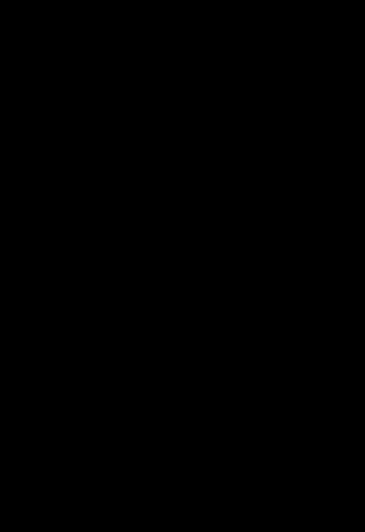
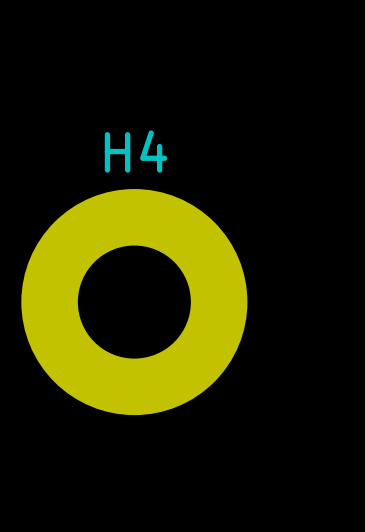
H4: none -> (134, 302)

